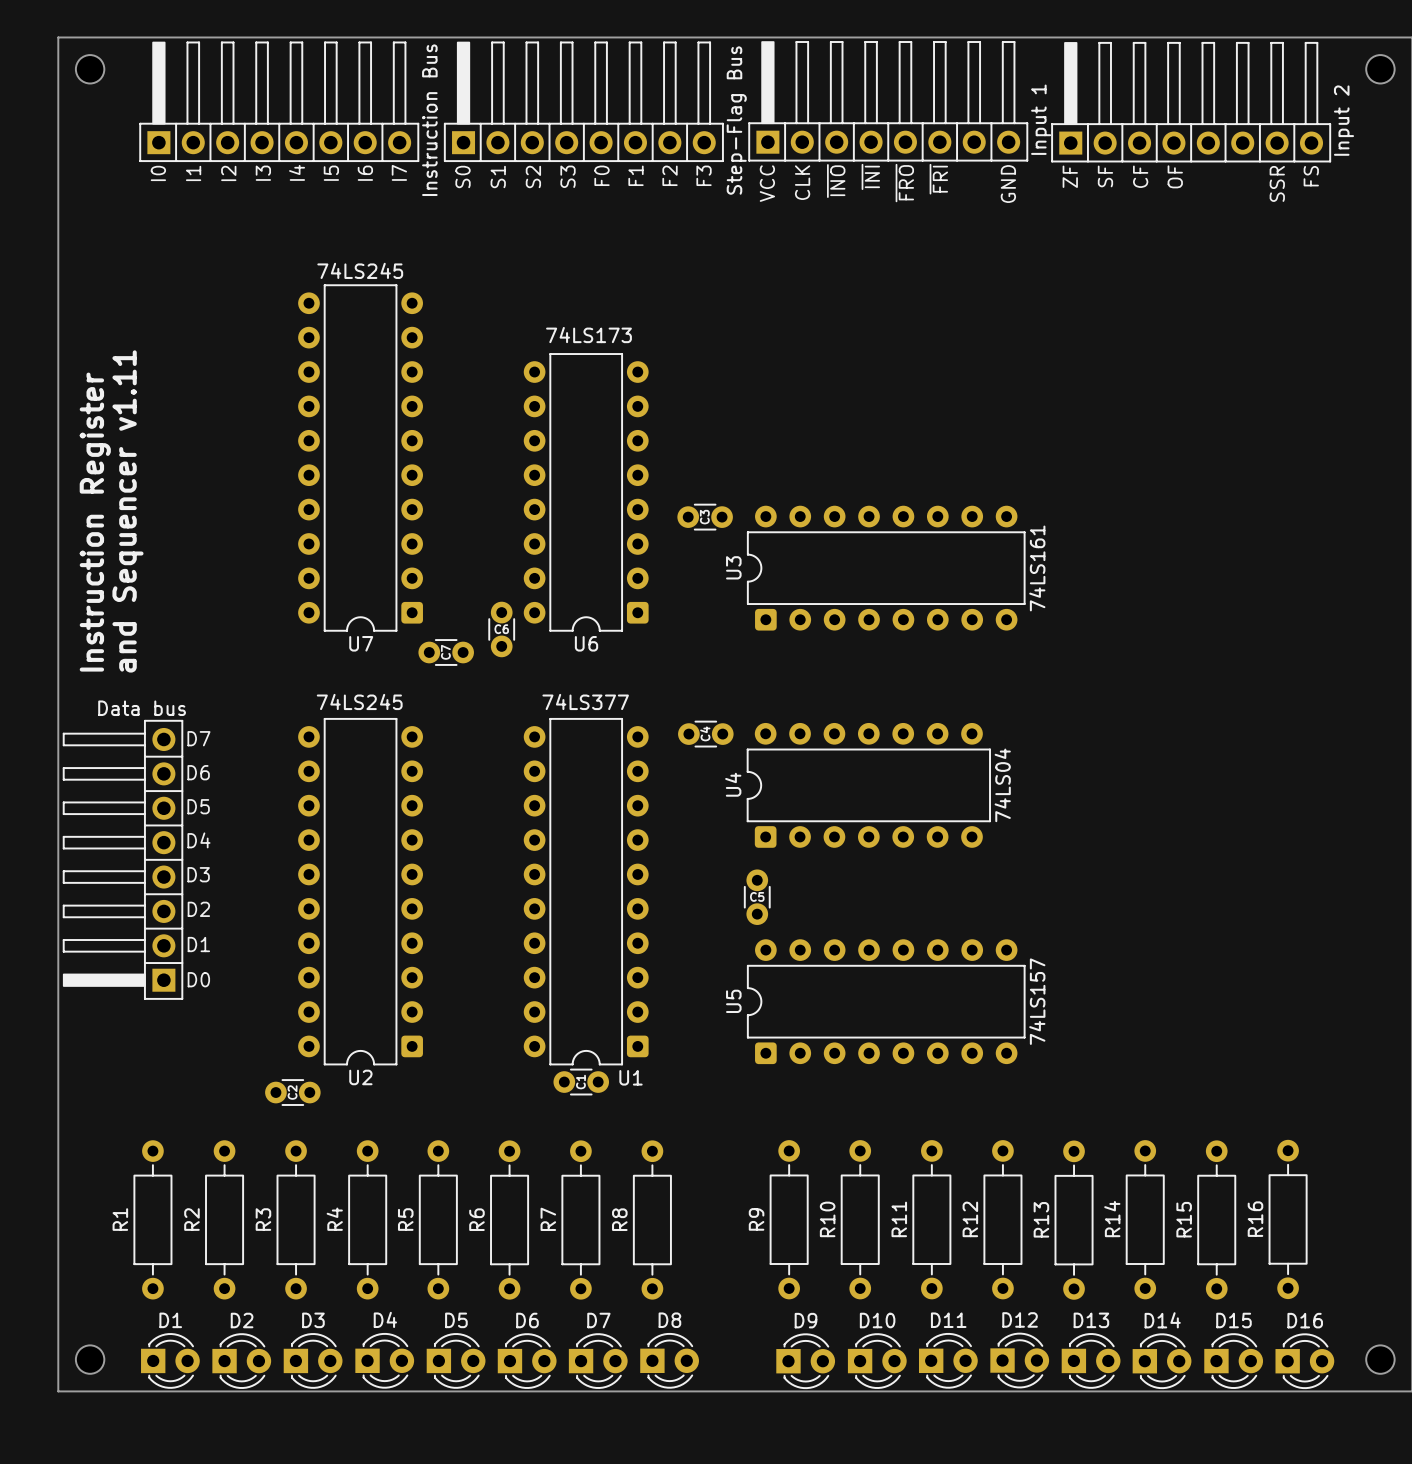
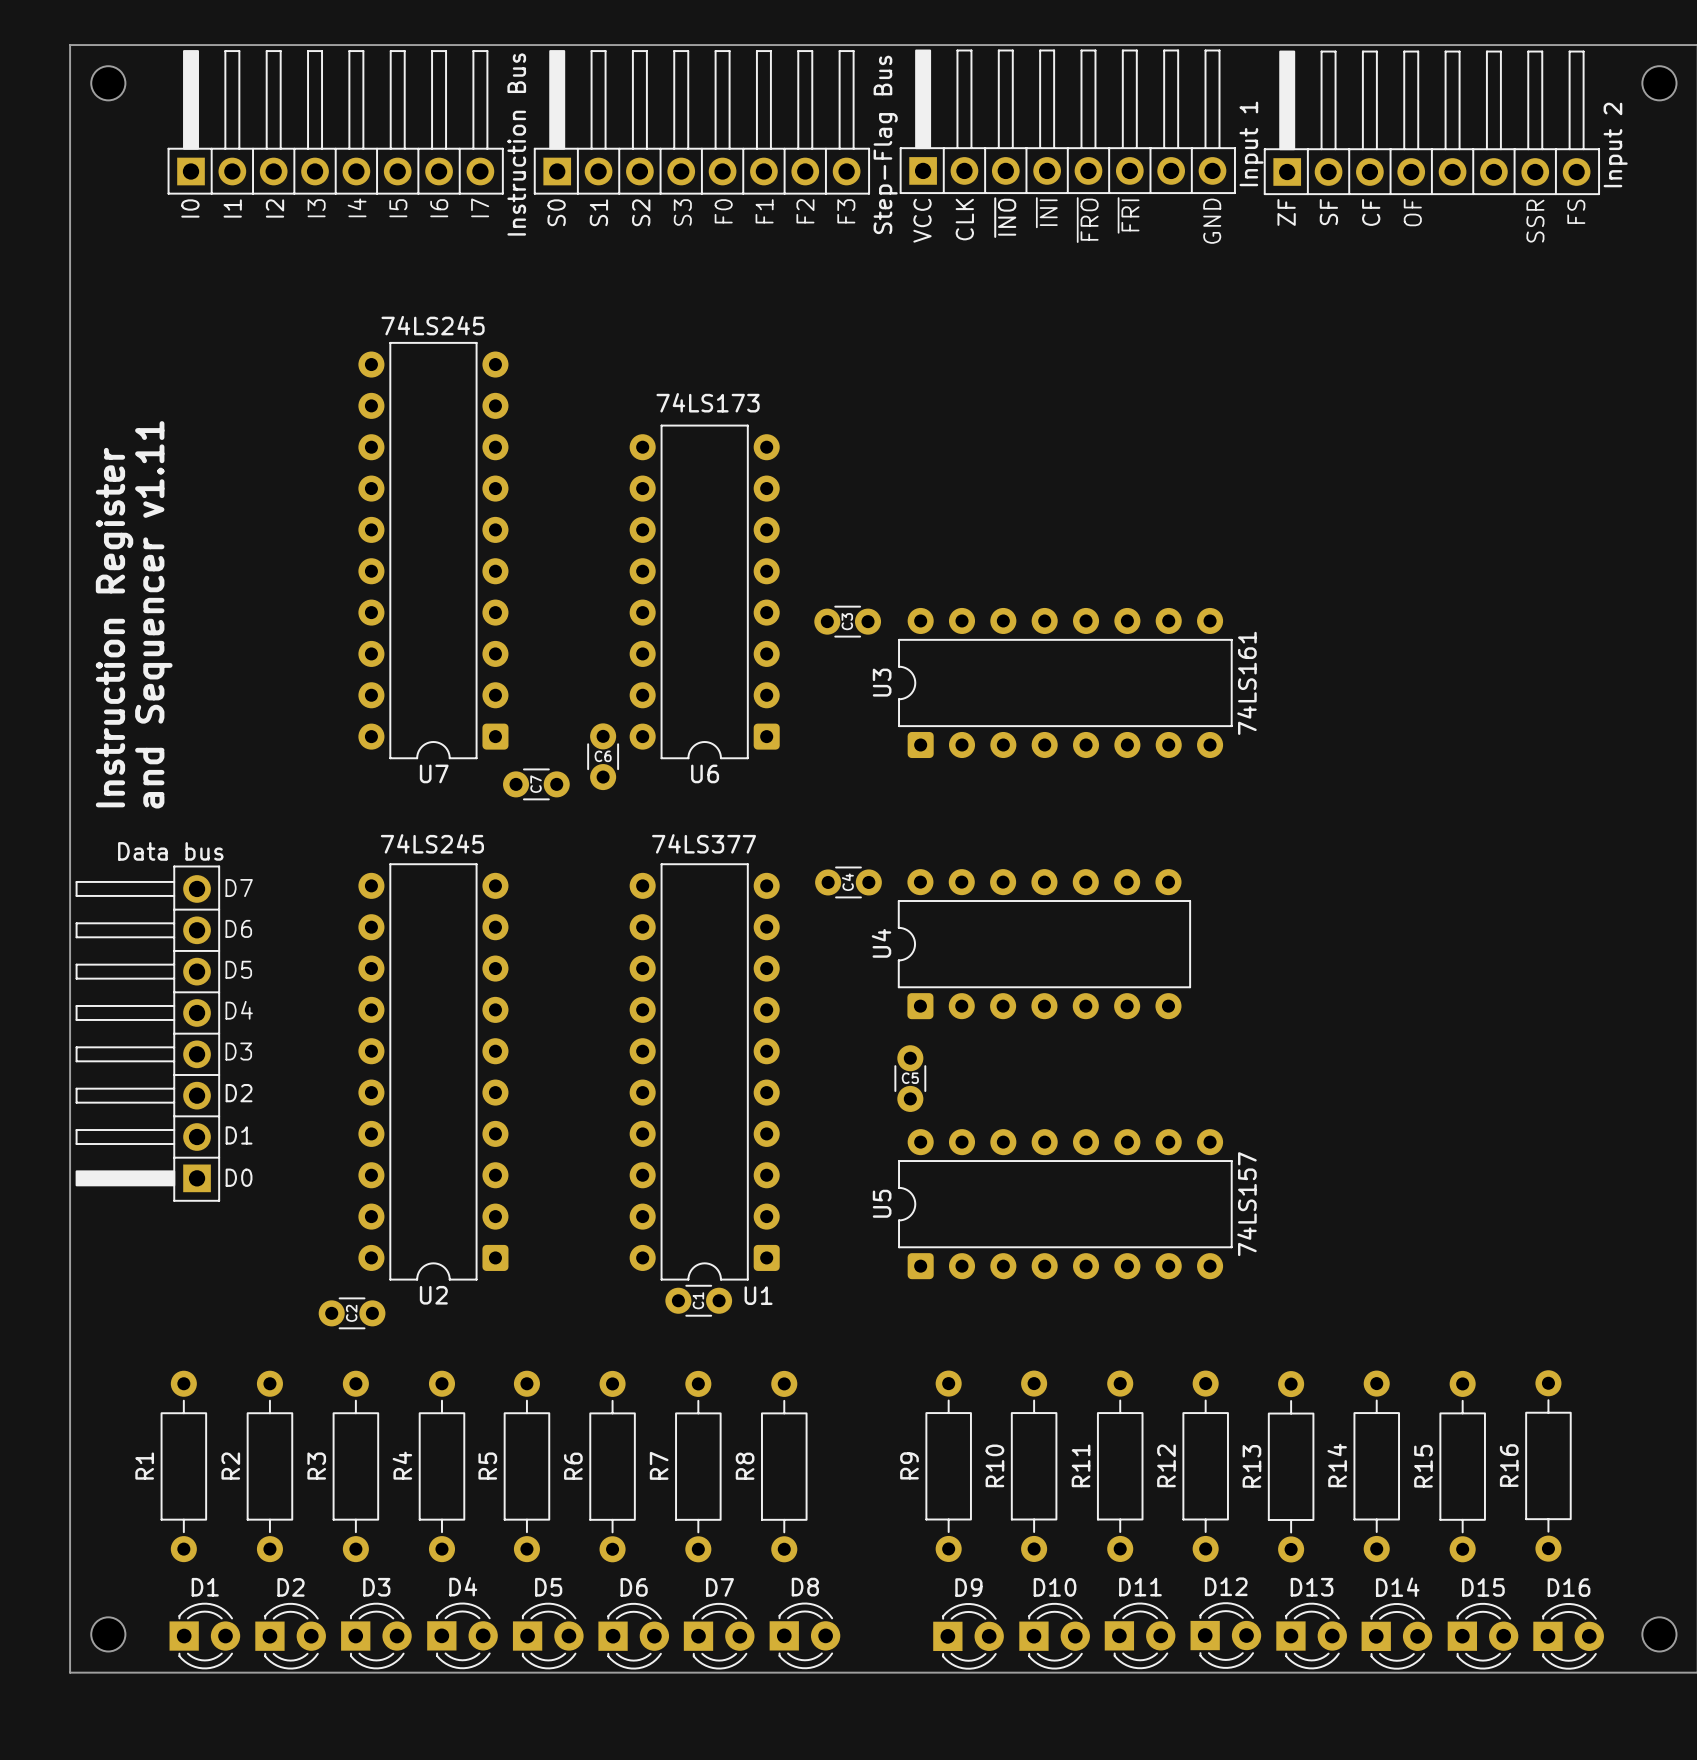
U4 value: 74LS04 (1002, 785) -> none

